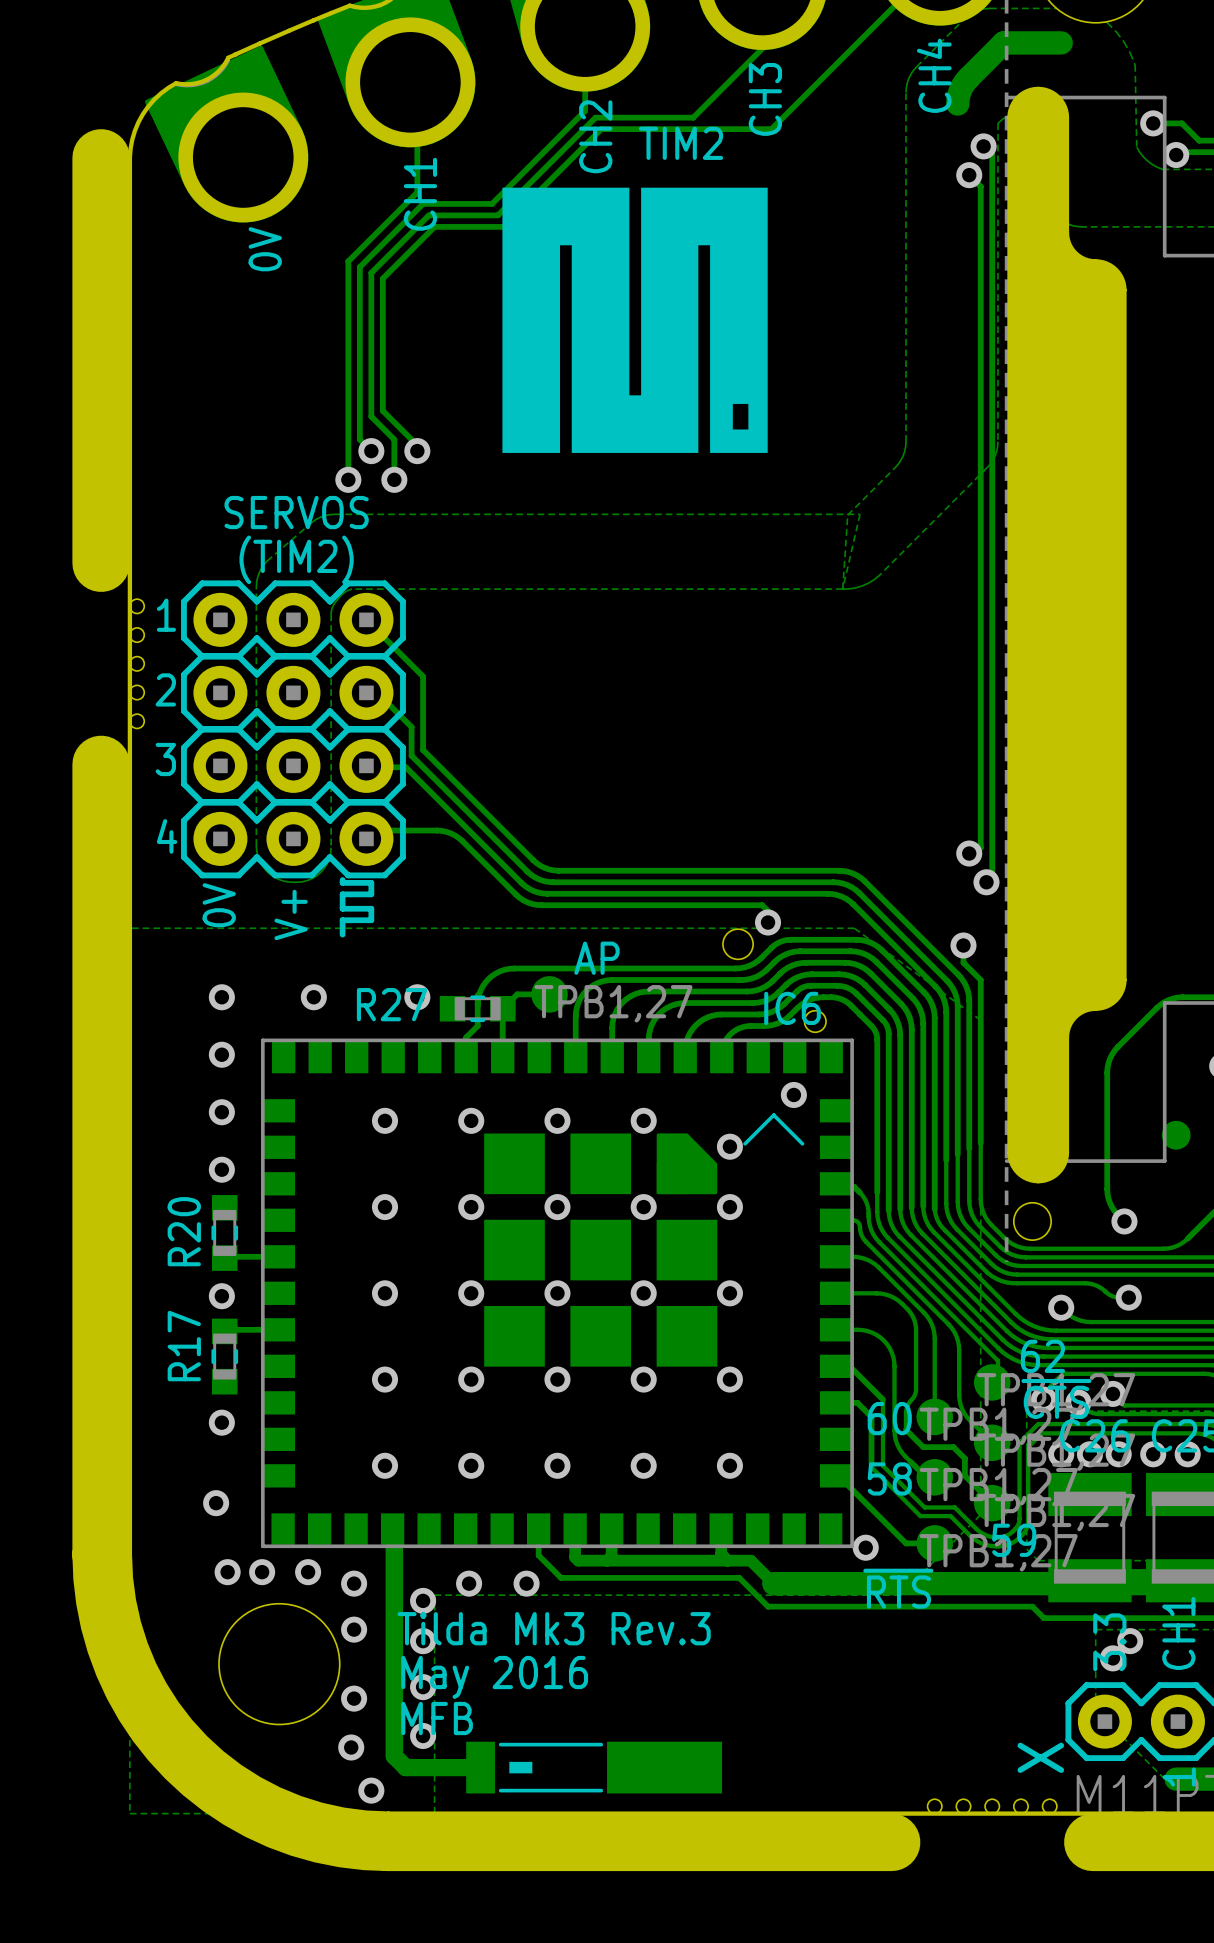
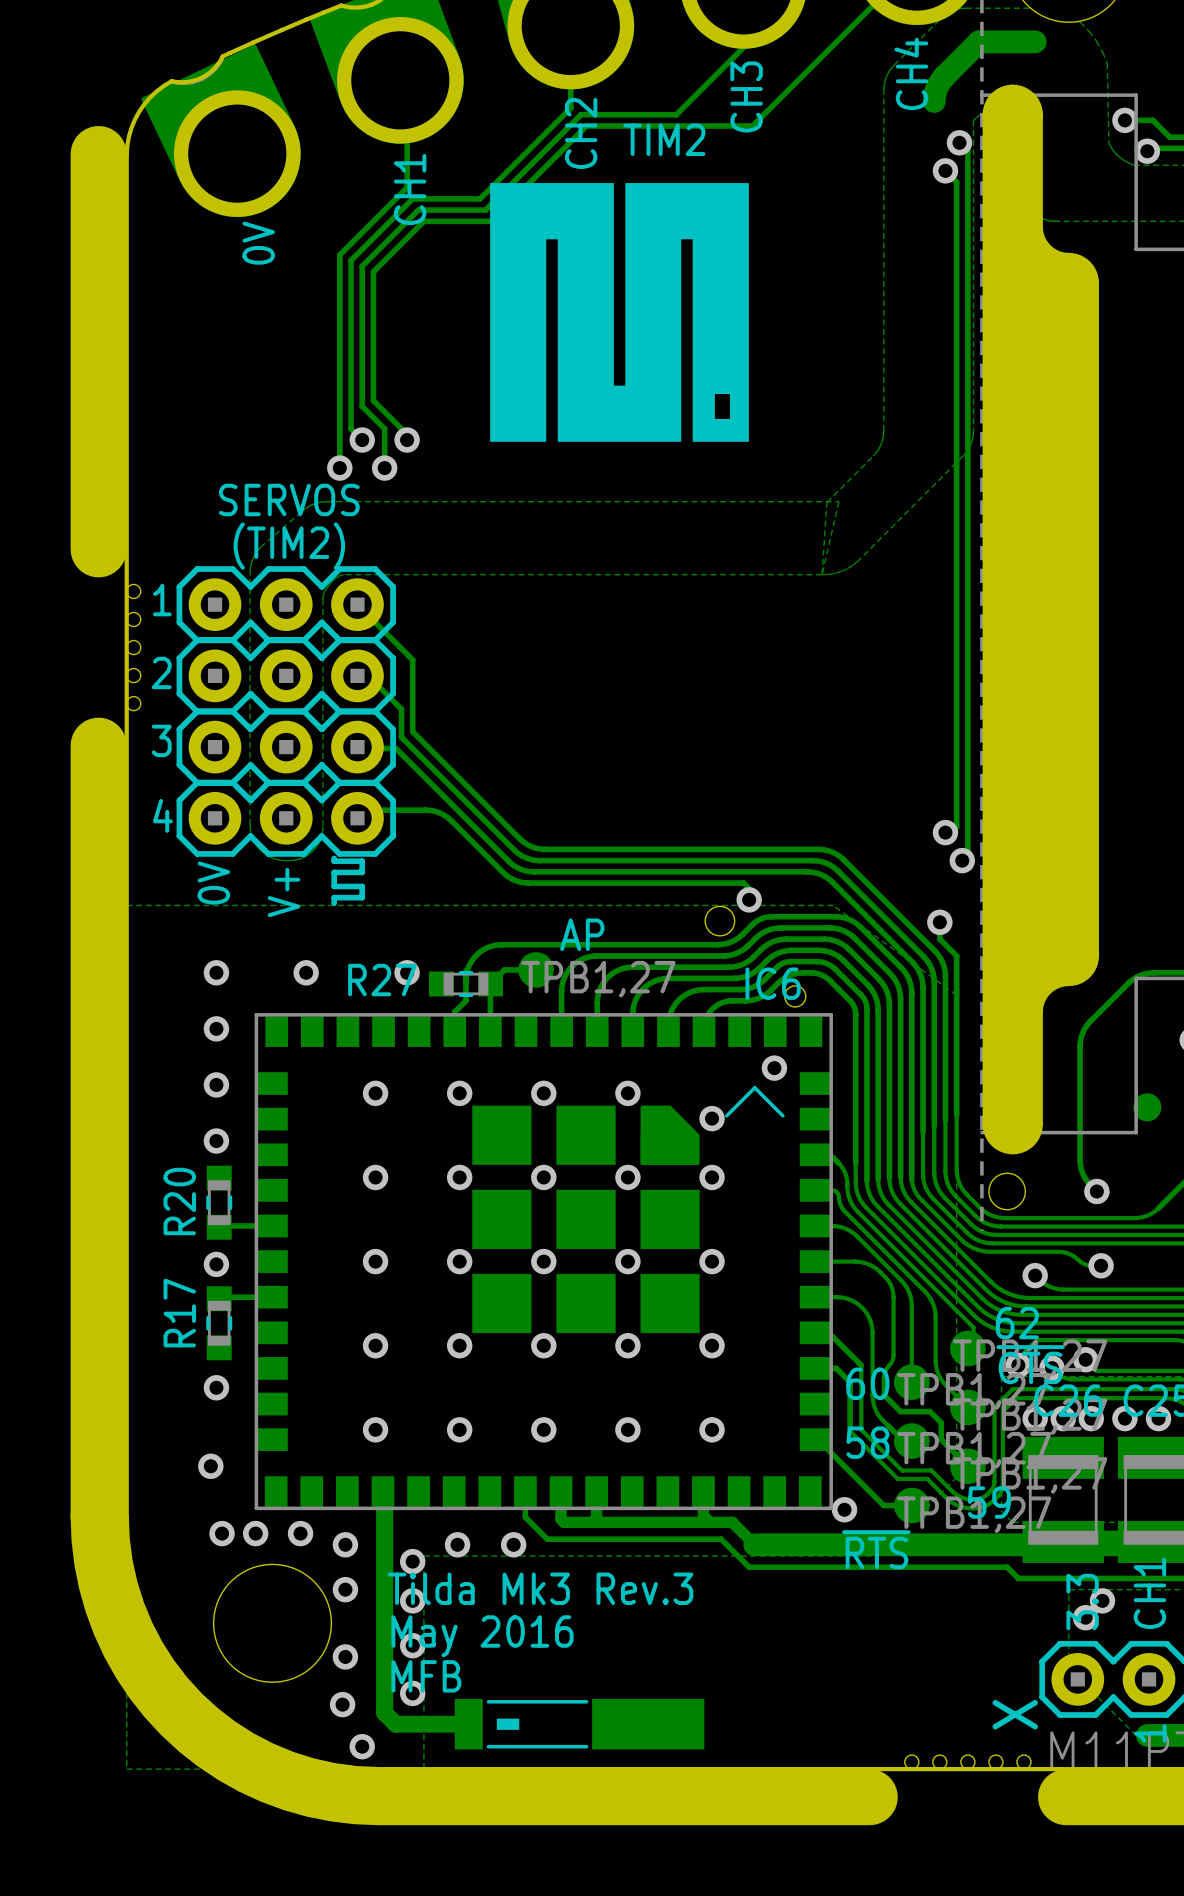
line: (342, 925) (342, 934) -> none

